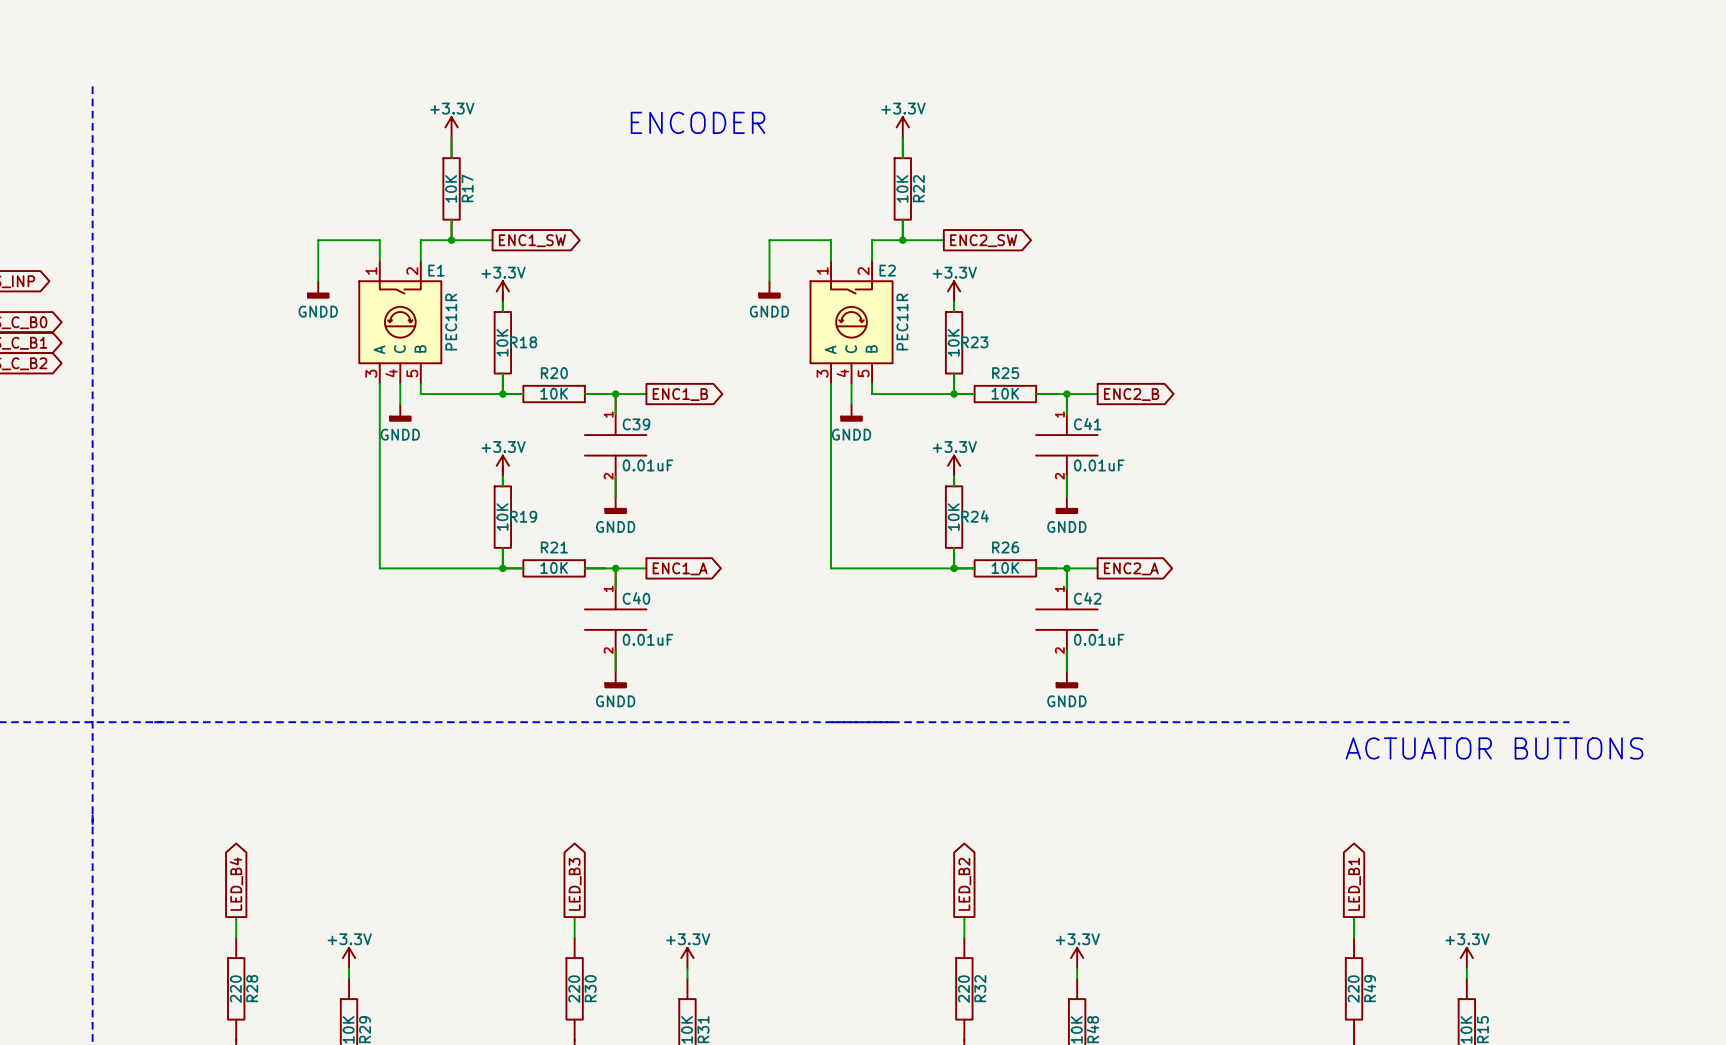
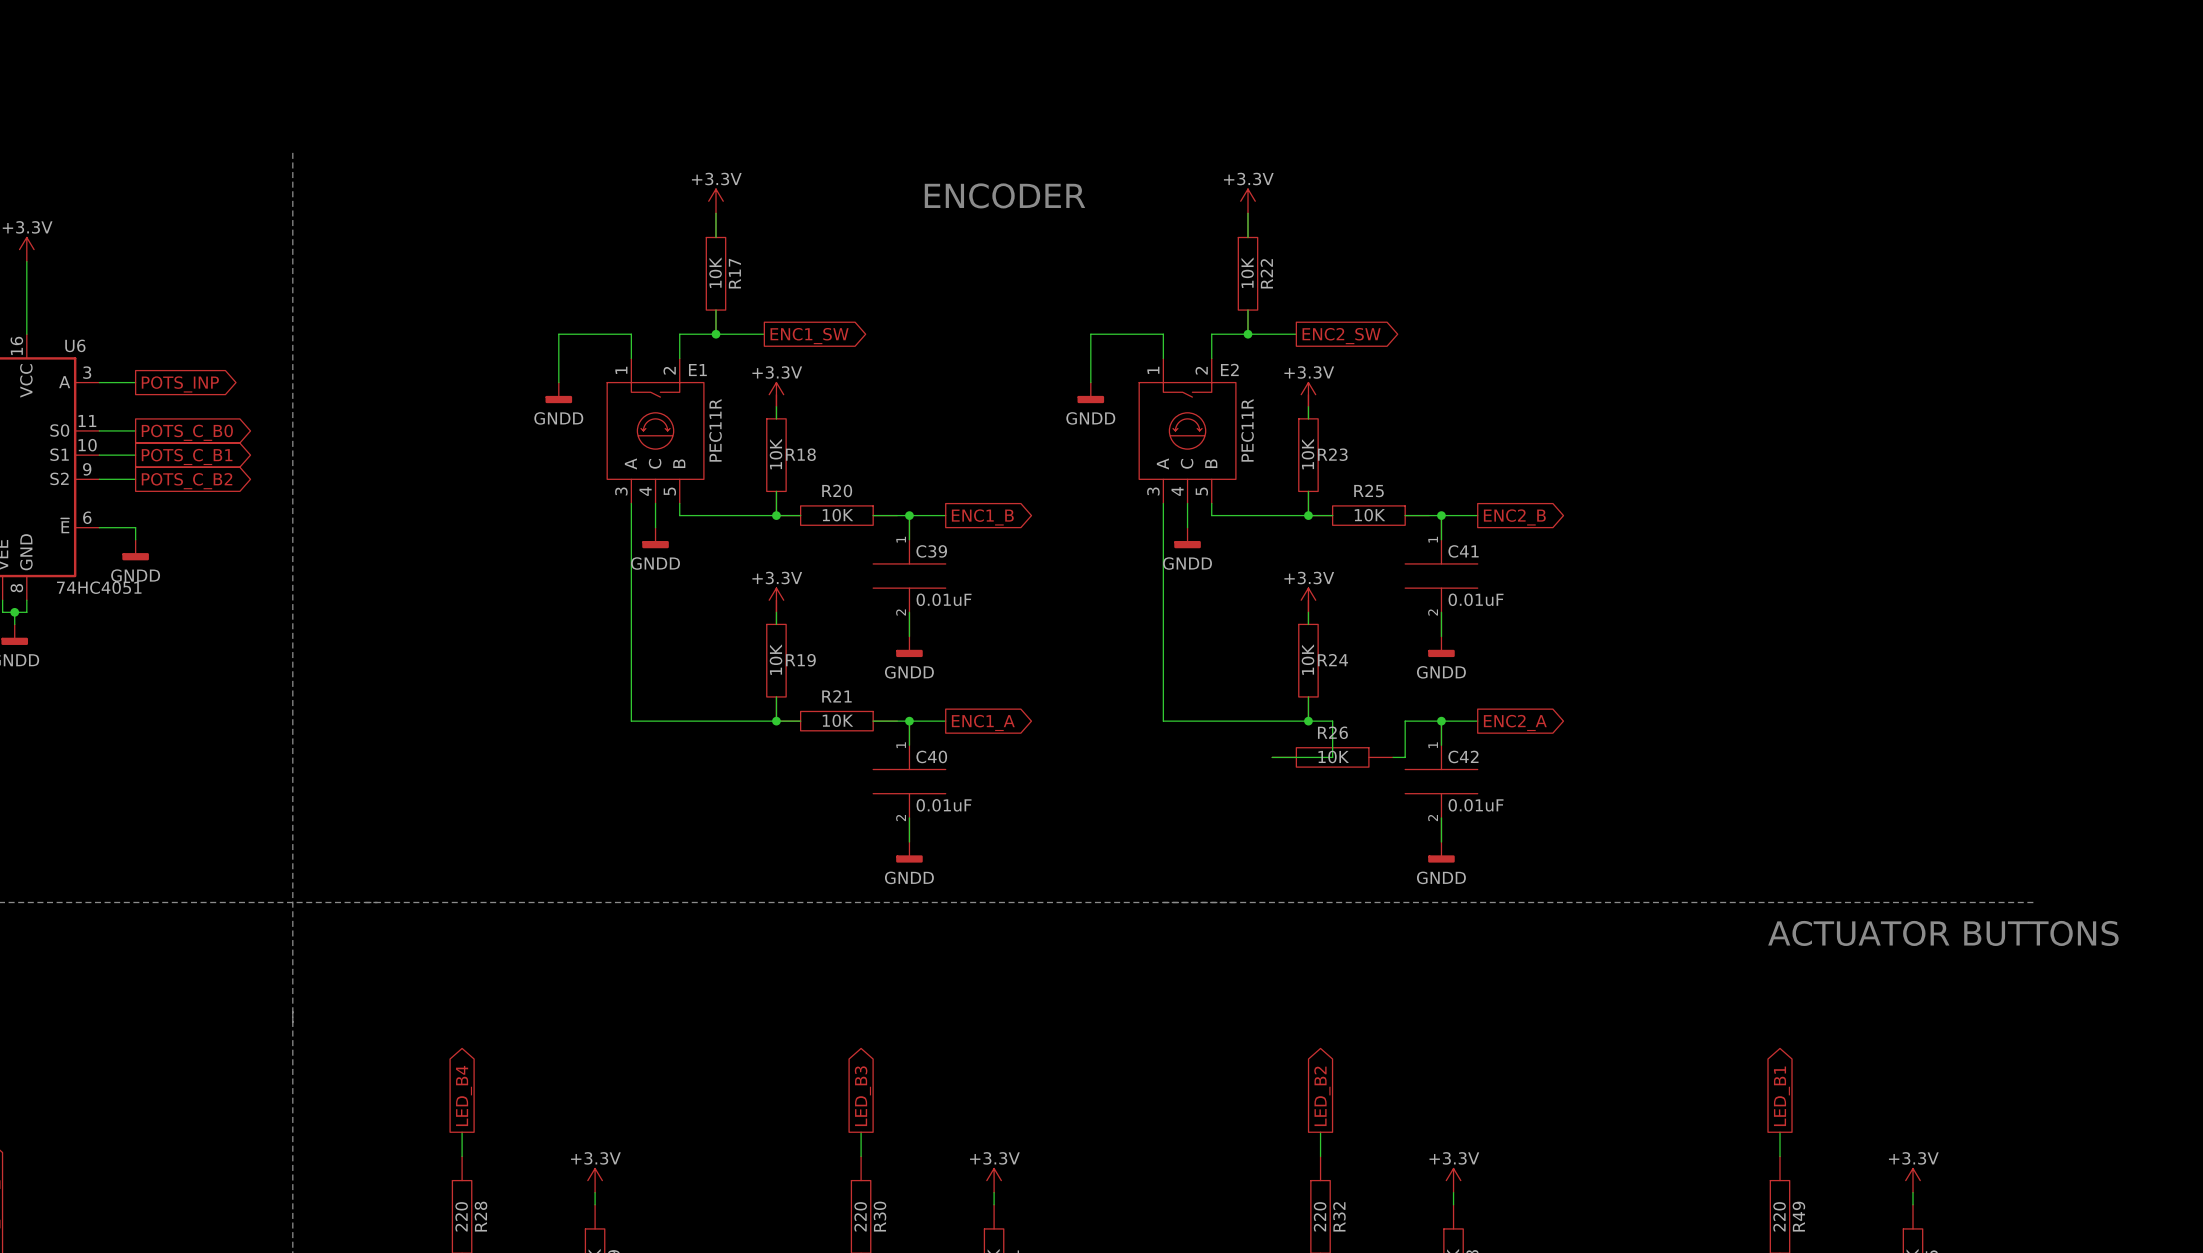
wire: none -> (1332, 721) (1332, 757) (1272, 757)
R26 position: (1005, 568) -> (1332, 757)
wire: none -> (1405, 721) (1405, 757) (1393, 757)

